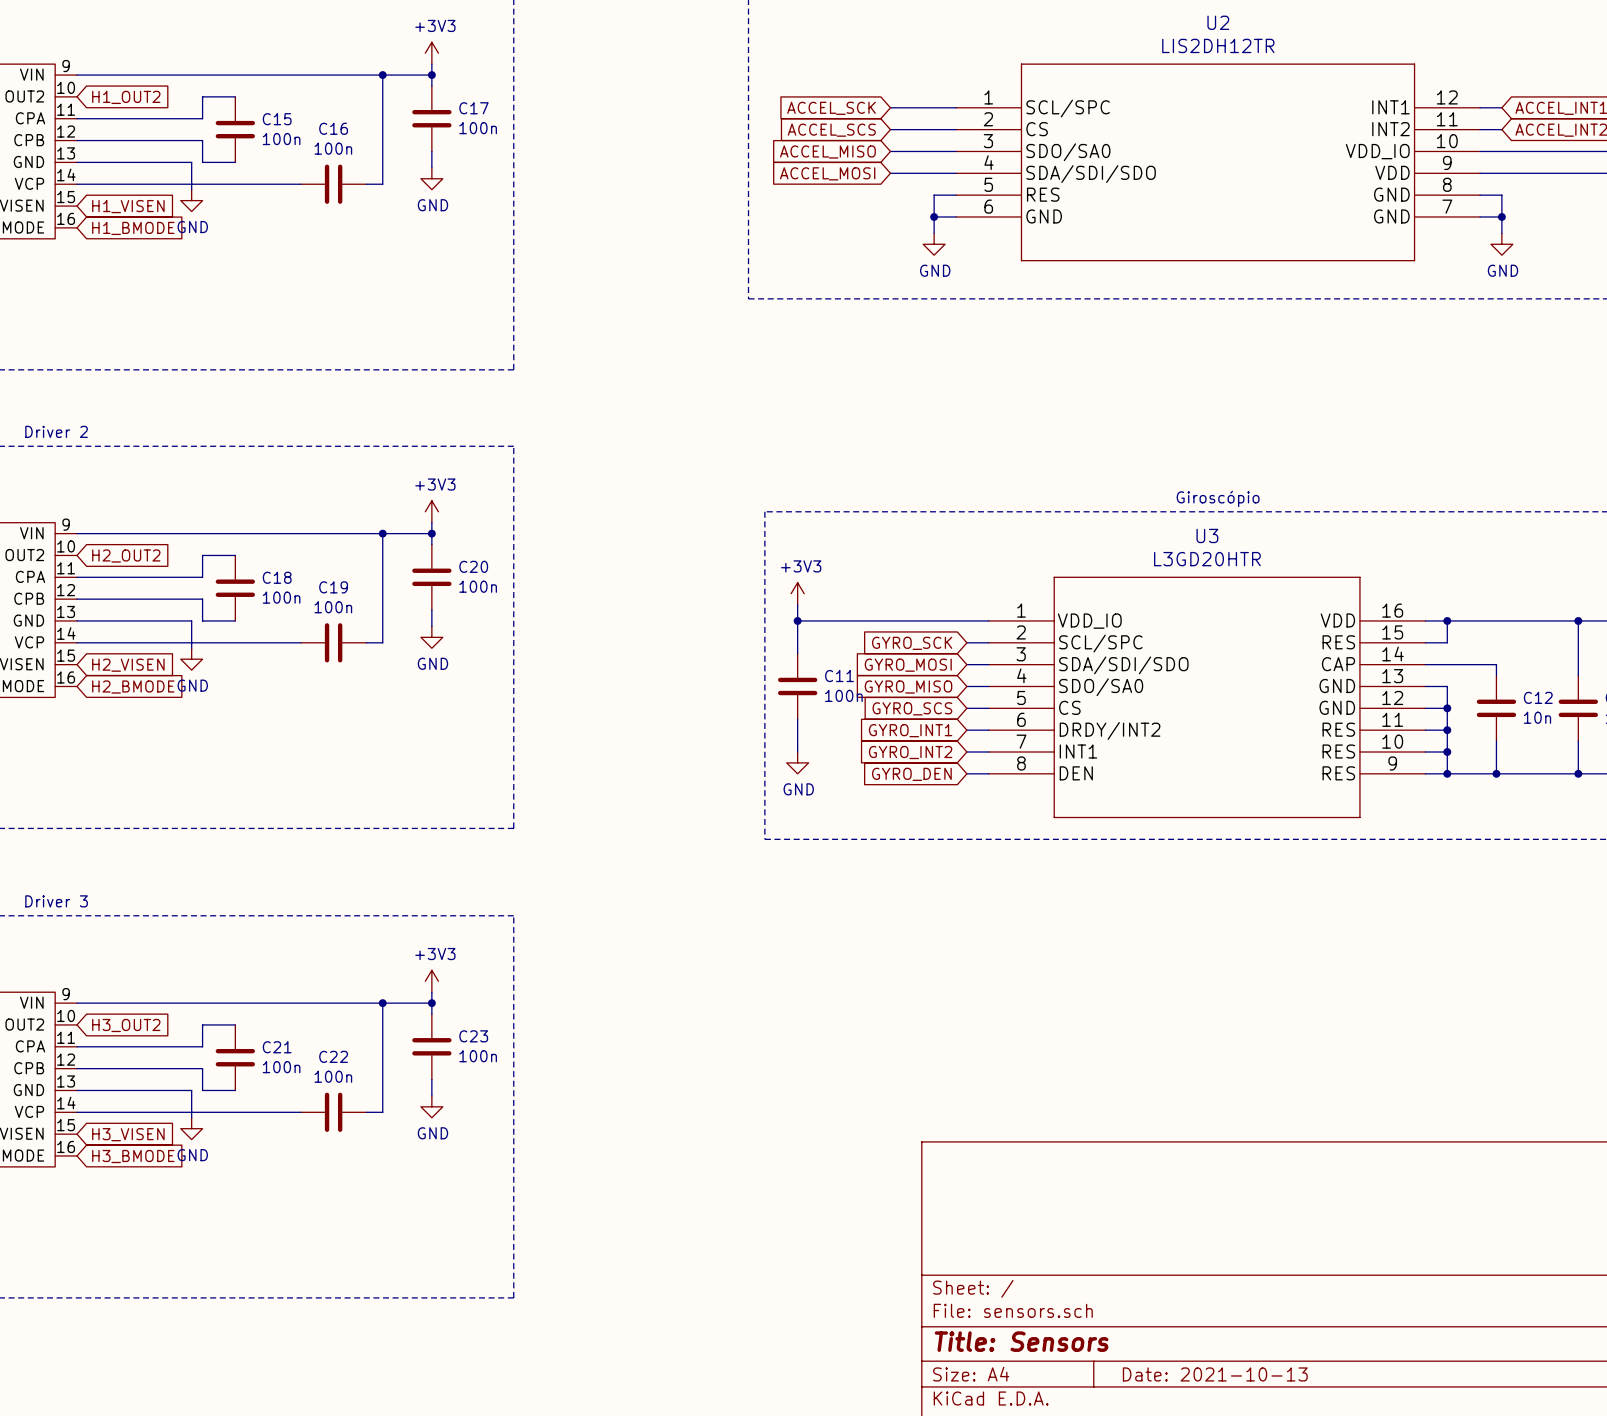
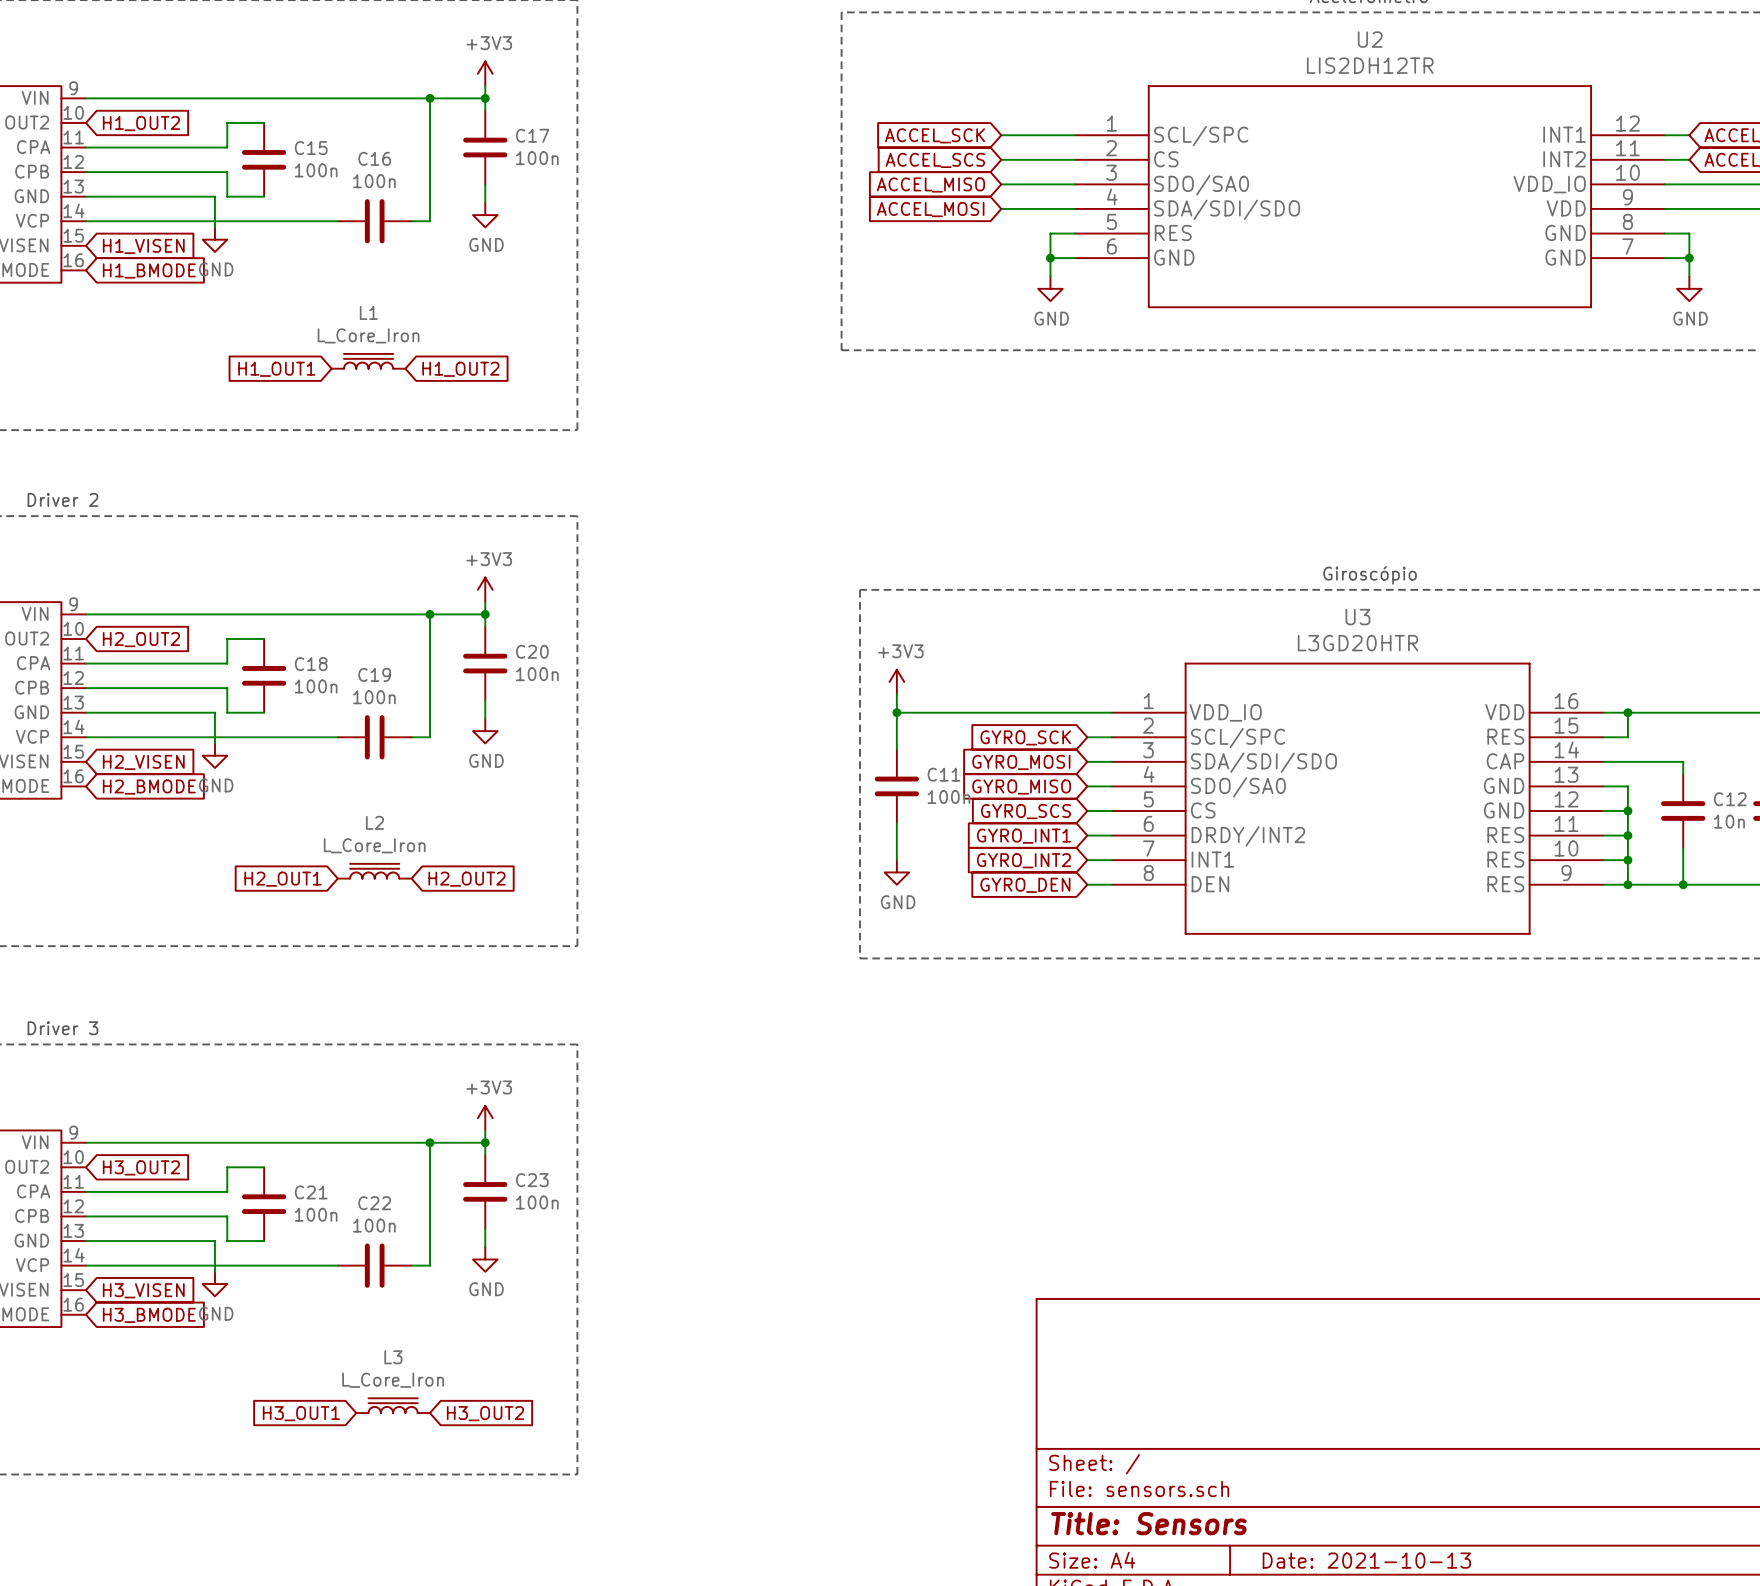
L1: none -> L_Core_Iron (368, 361)
global label: none -> H1_OUT1 (276, 369)
global label: none -> H1_OUT2 (460, 369)
L2: none -> L_Core_Iron (374, 871)
global label: none -> H2_OUT1 (282, 879)
global label: none -> H2_OUT2 (467, 879)
L3: none -> L_Core_Iron (393, 1405)
global label: none -> H3_OUT1 (301, 1413)
global label: none -> H3_OUT2 (485, 1413)

